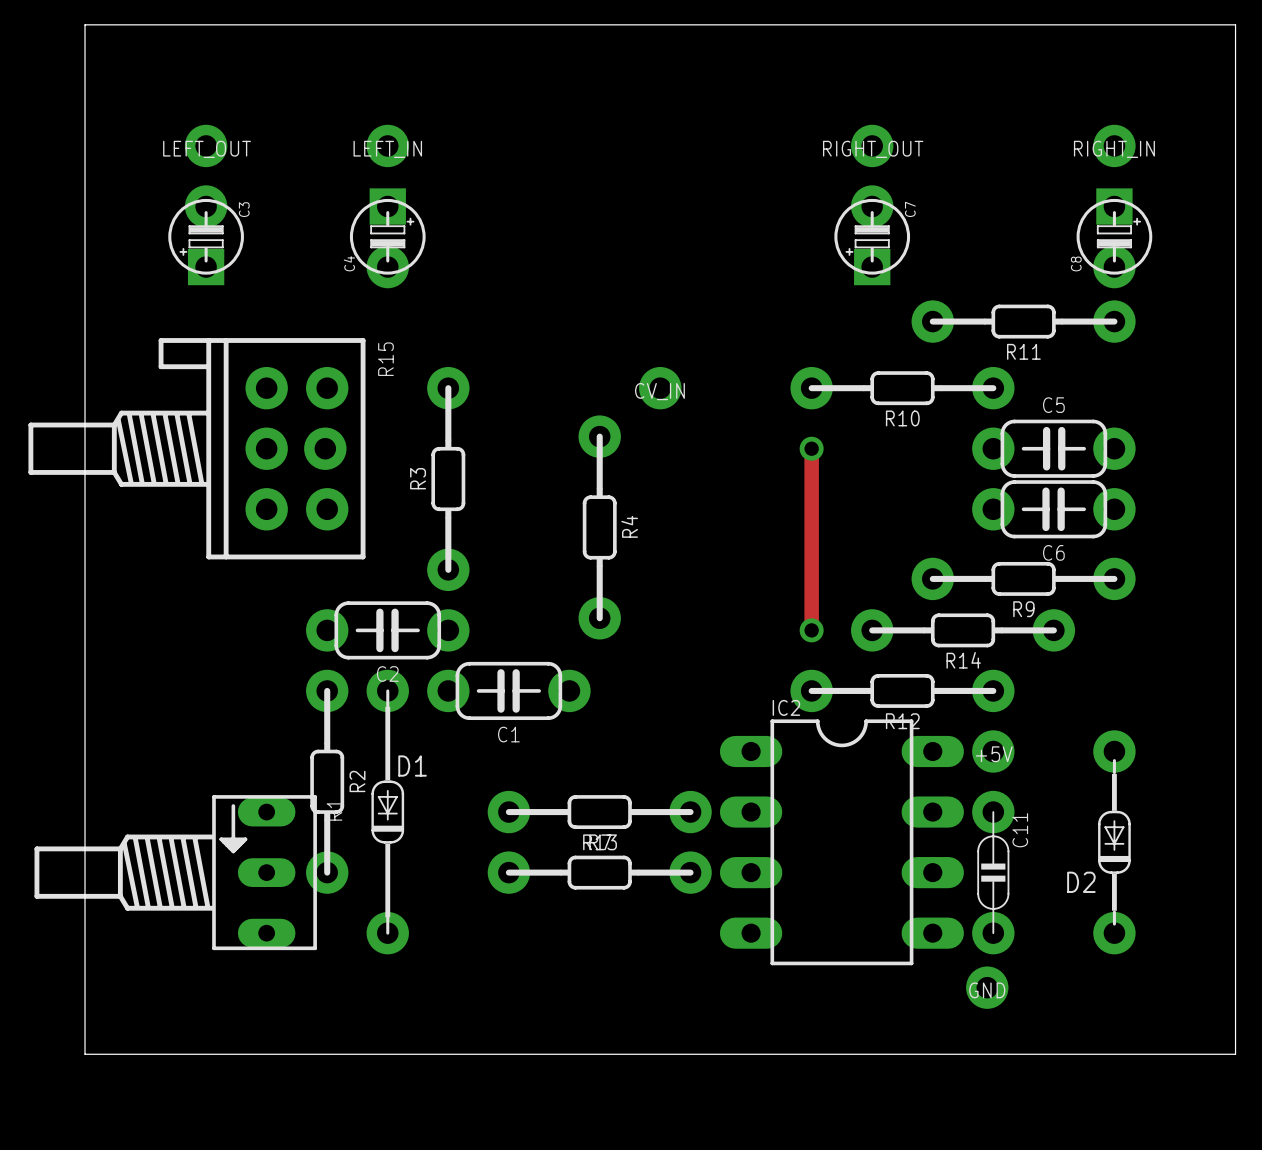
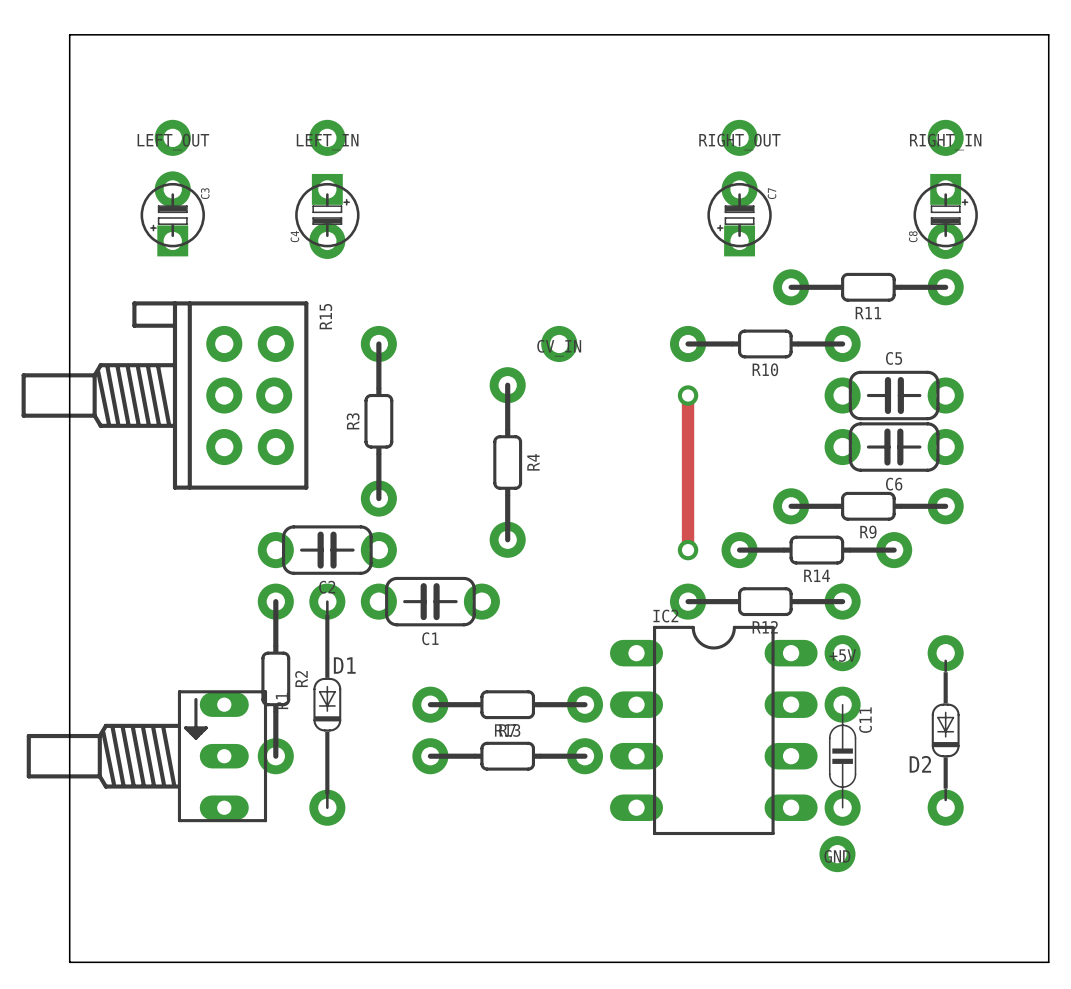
board edge: (85, 1054) (1235, 1054) -> (69, 910) (69, 962) (1048, 962) (1048, 910)

